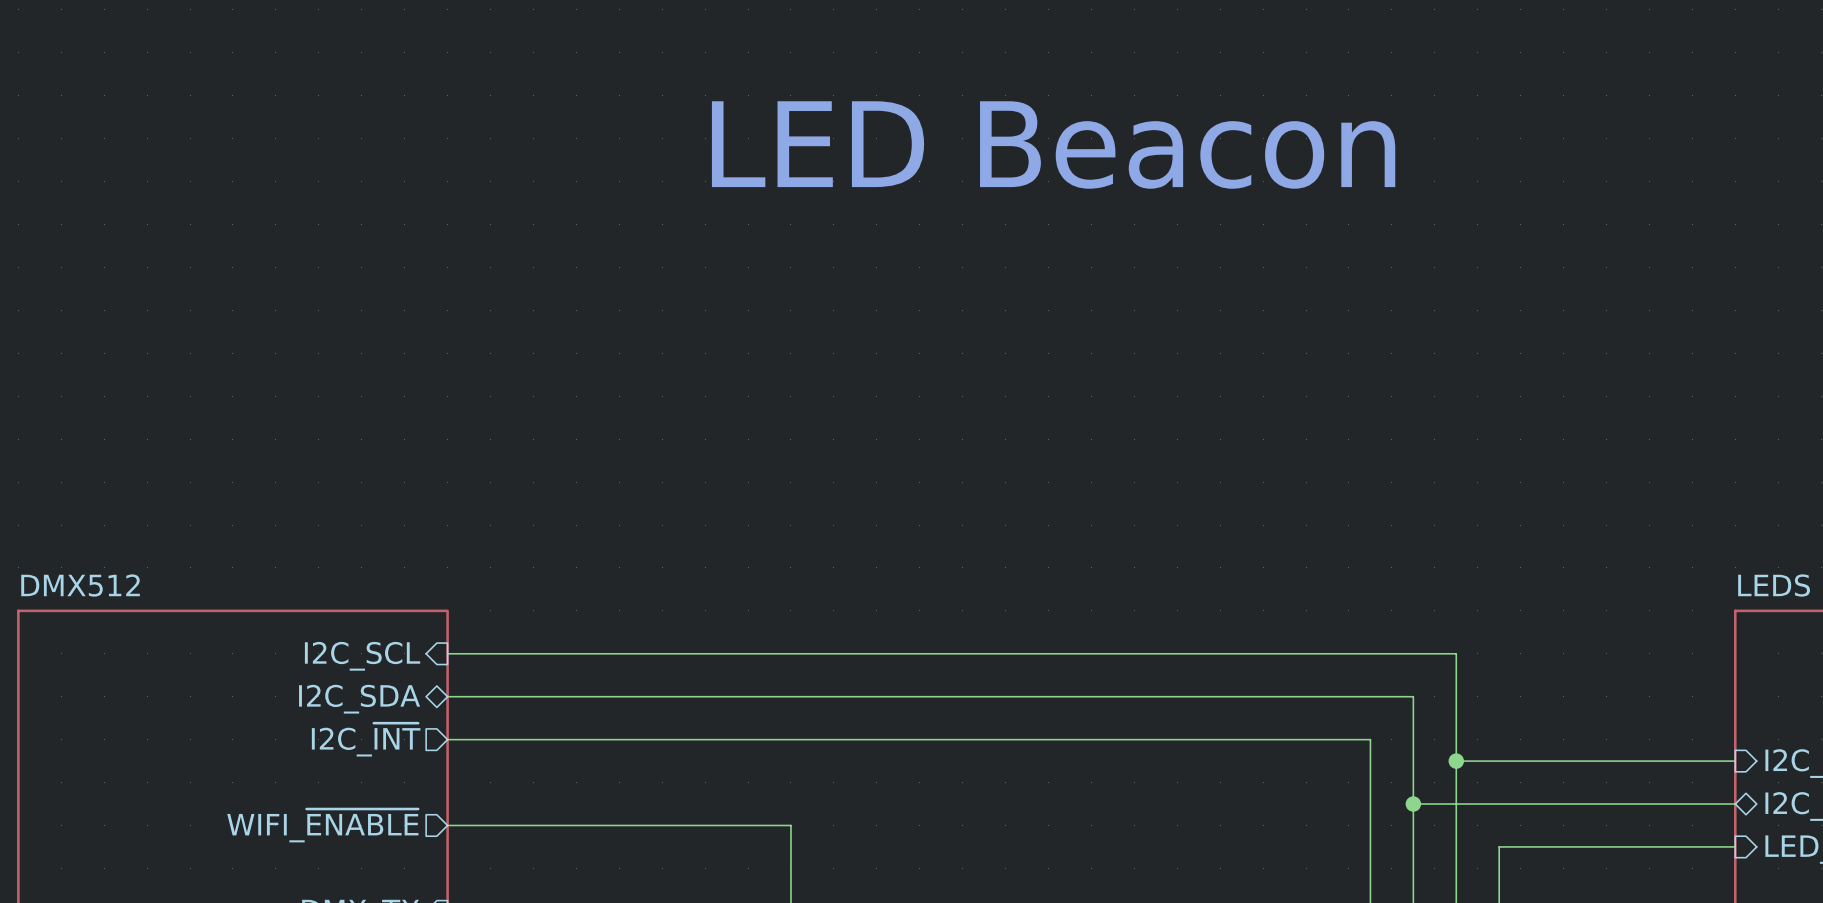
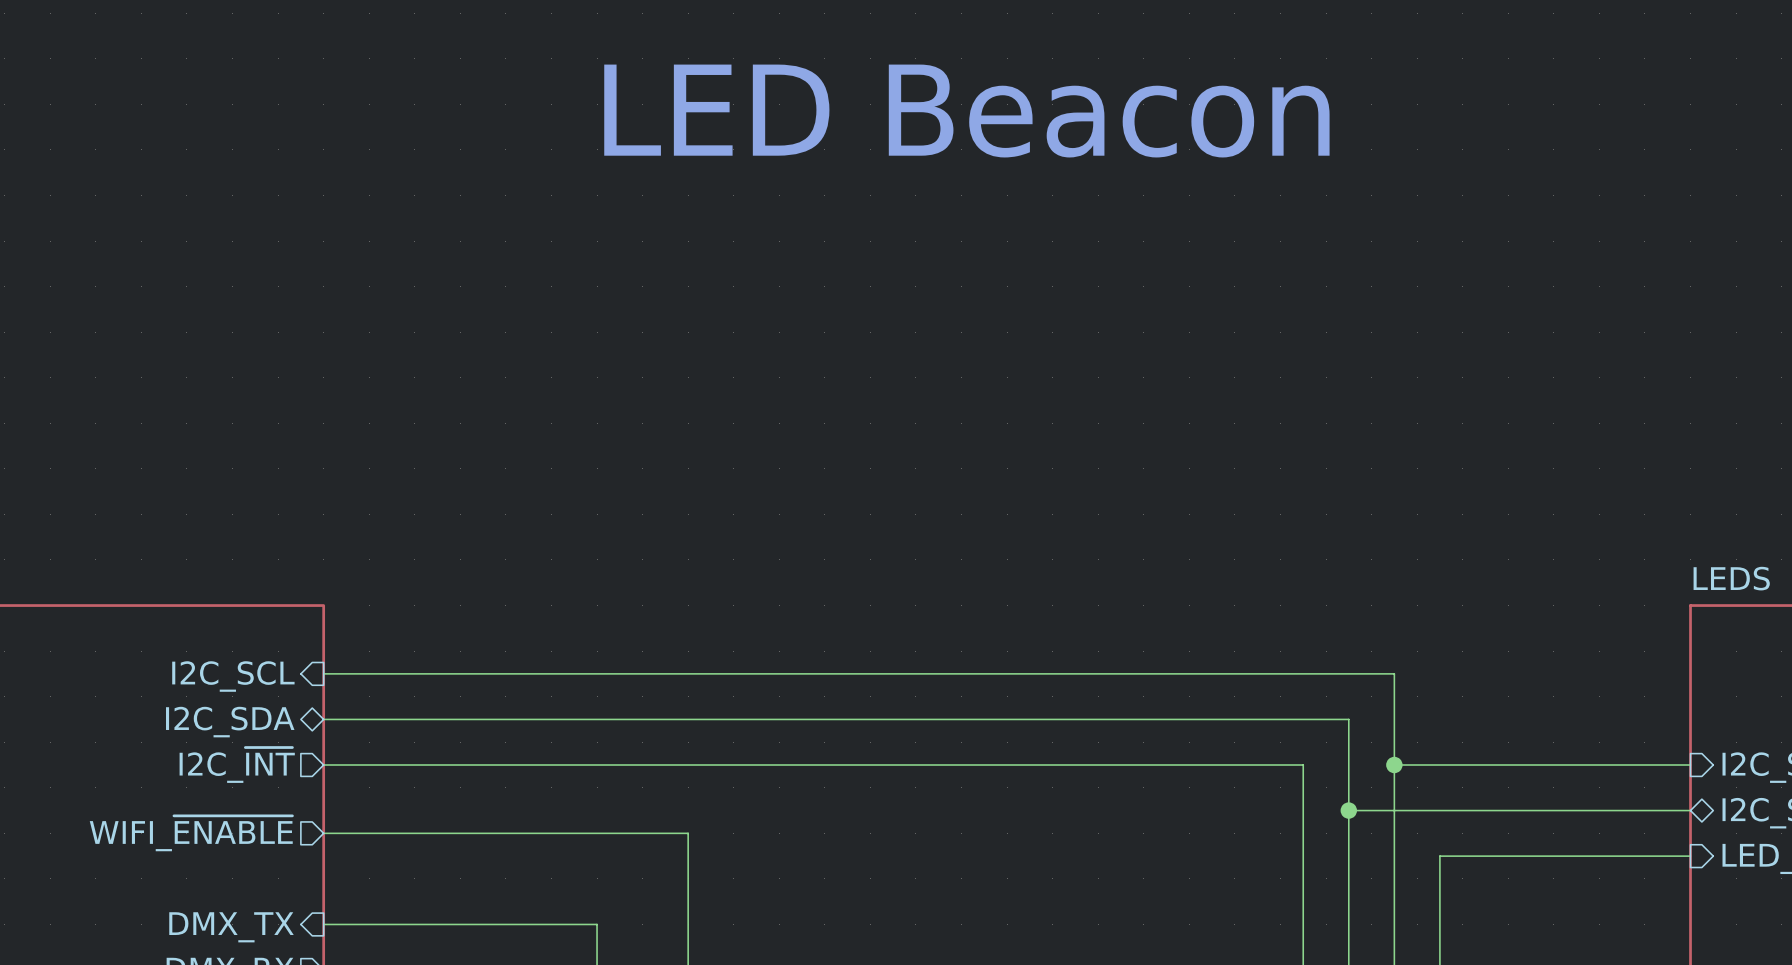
wire: (447, 653) (1456, 653) (1456, 675) -> (323, 673) (1394, 673)
sheet pin position: I2C_SCL (362, 656) -> I2C_SCL (233, 676)
wire: (447, 696) (1413, 696) (1413, 718) -> (323, 719) (1348, 719)
sheet pin position: I2C_SDA (359, 699) -> I2C_SDA (230, 722)
sheet pin position: I2C_~{INT} (366, 739) -> I2C_~{INT} (237, 765)
wire: (447, 739) (1370, 739) (1370, 761) -> (323, 765) (1303, 765)

